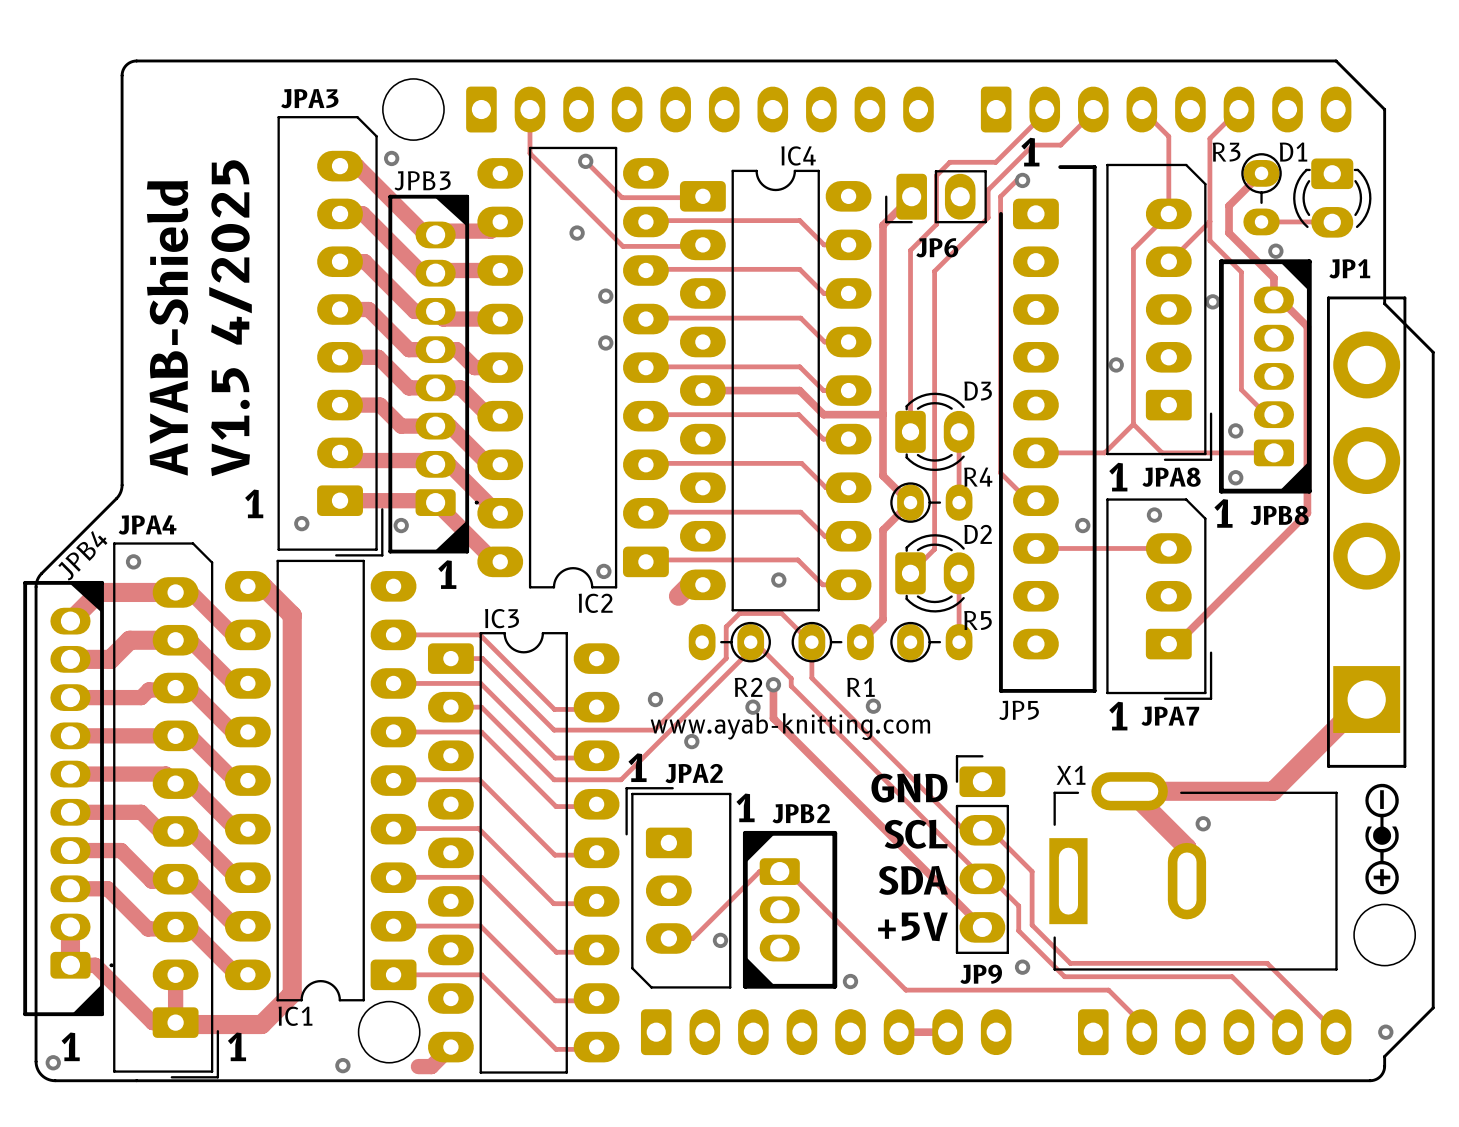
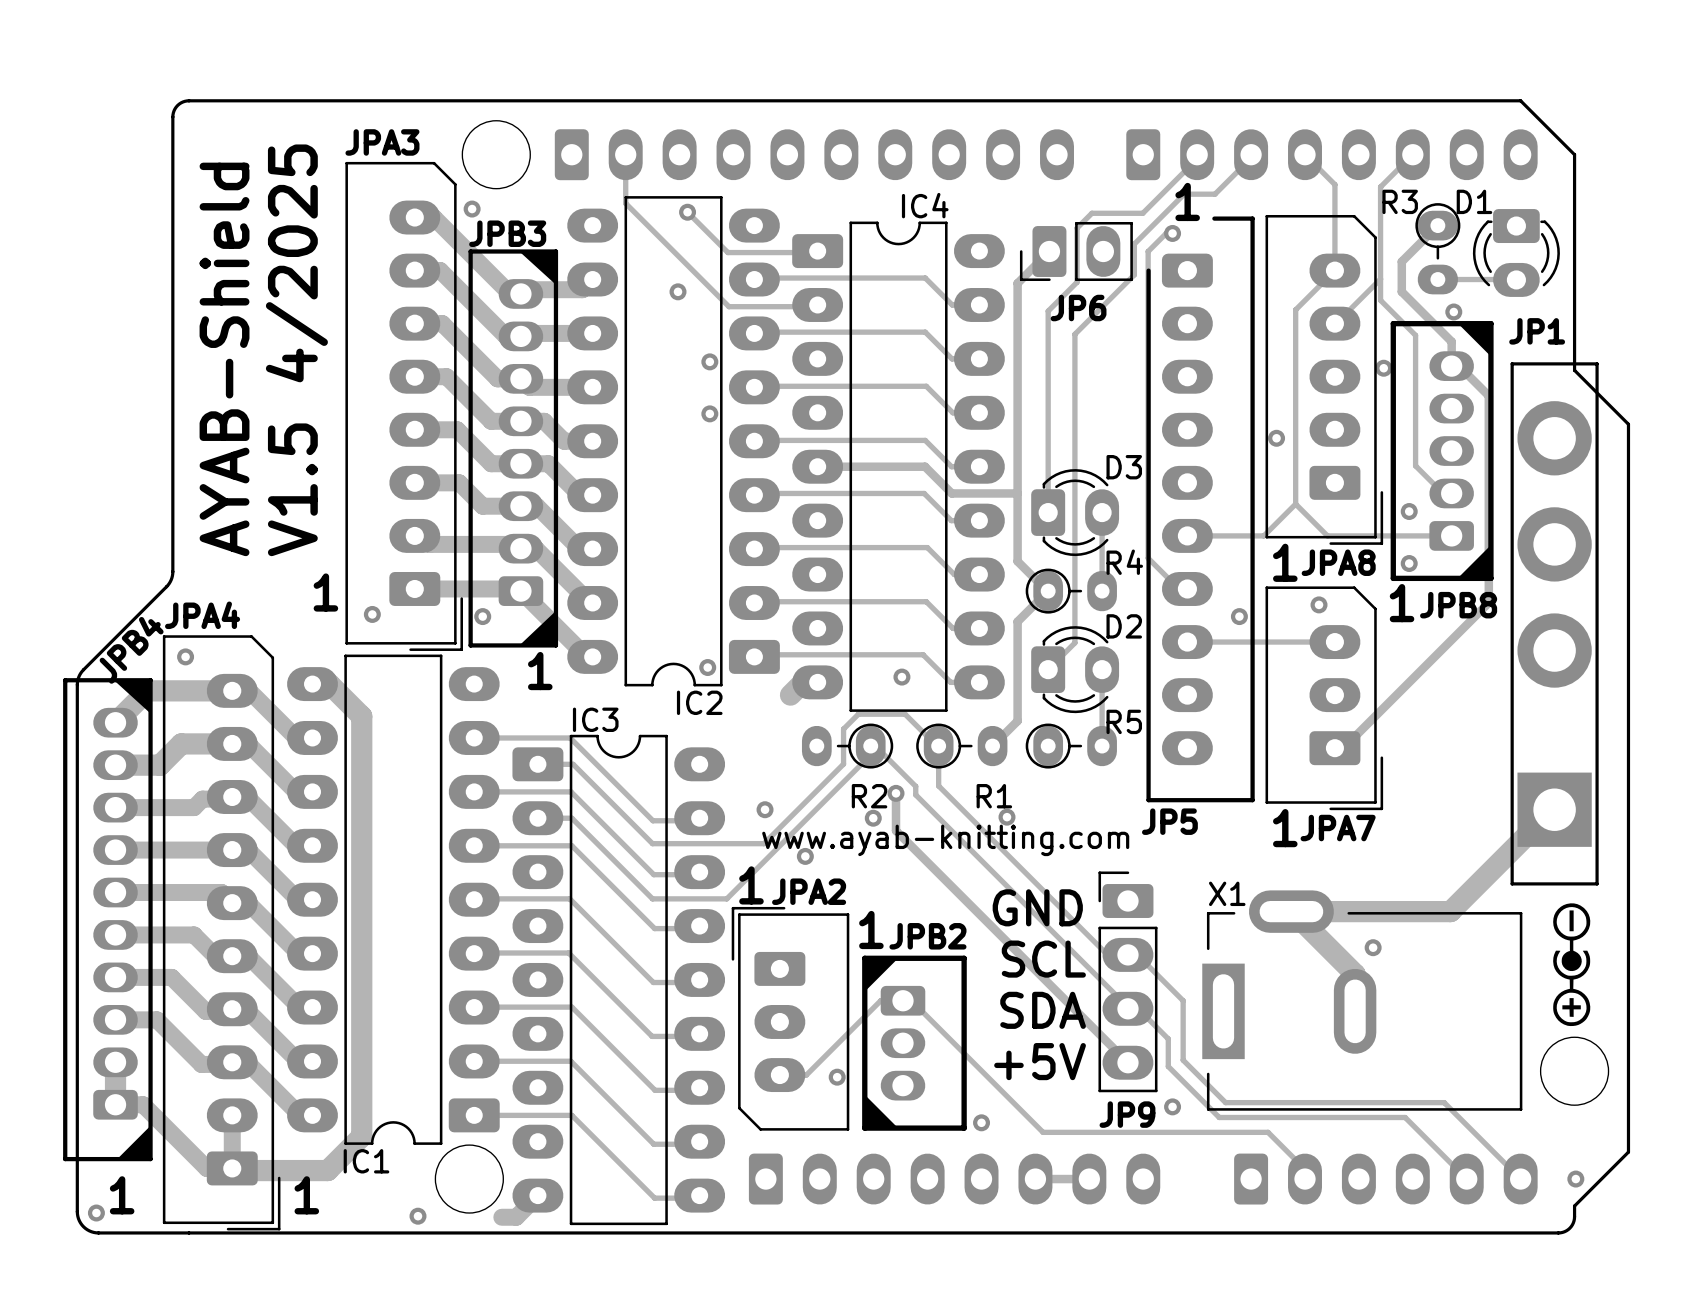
JPB3 footprint: [388, 194, 479, 554] -> [468, 249, 559, 648]
JPB4 footprint: [23, 580, 114, 1017] -> [63, 678, 153, 1162]

